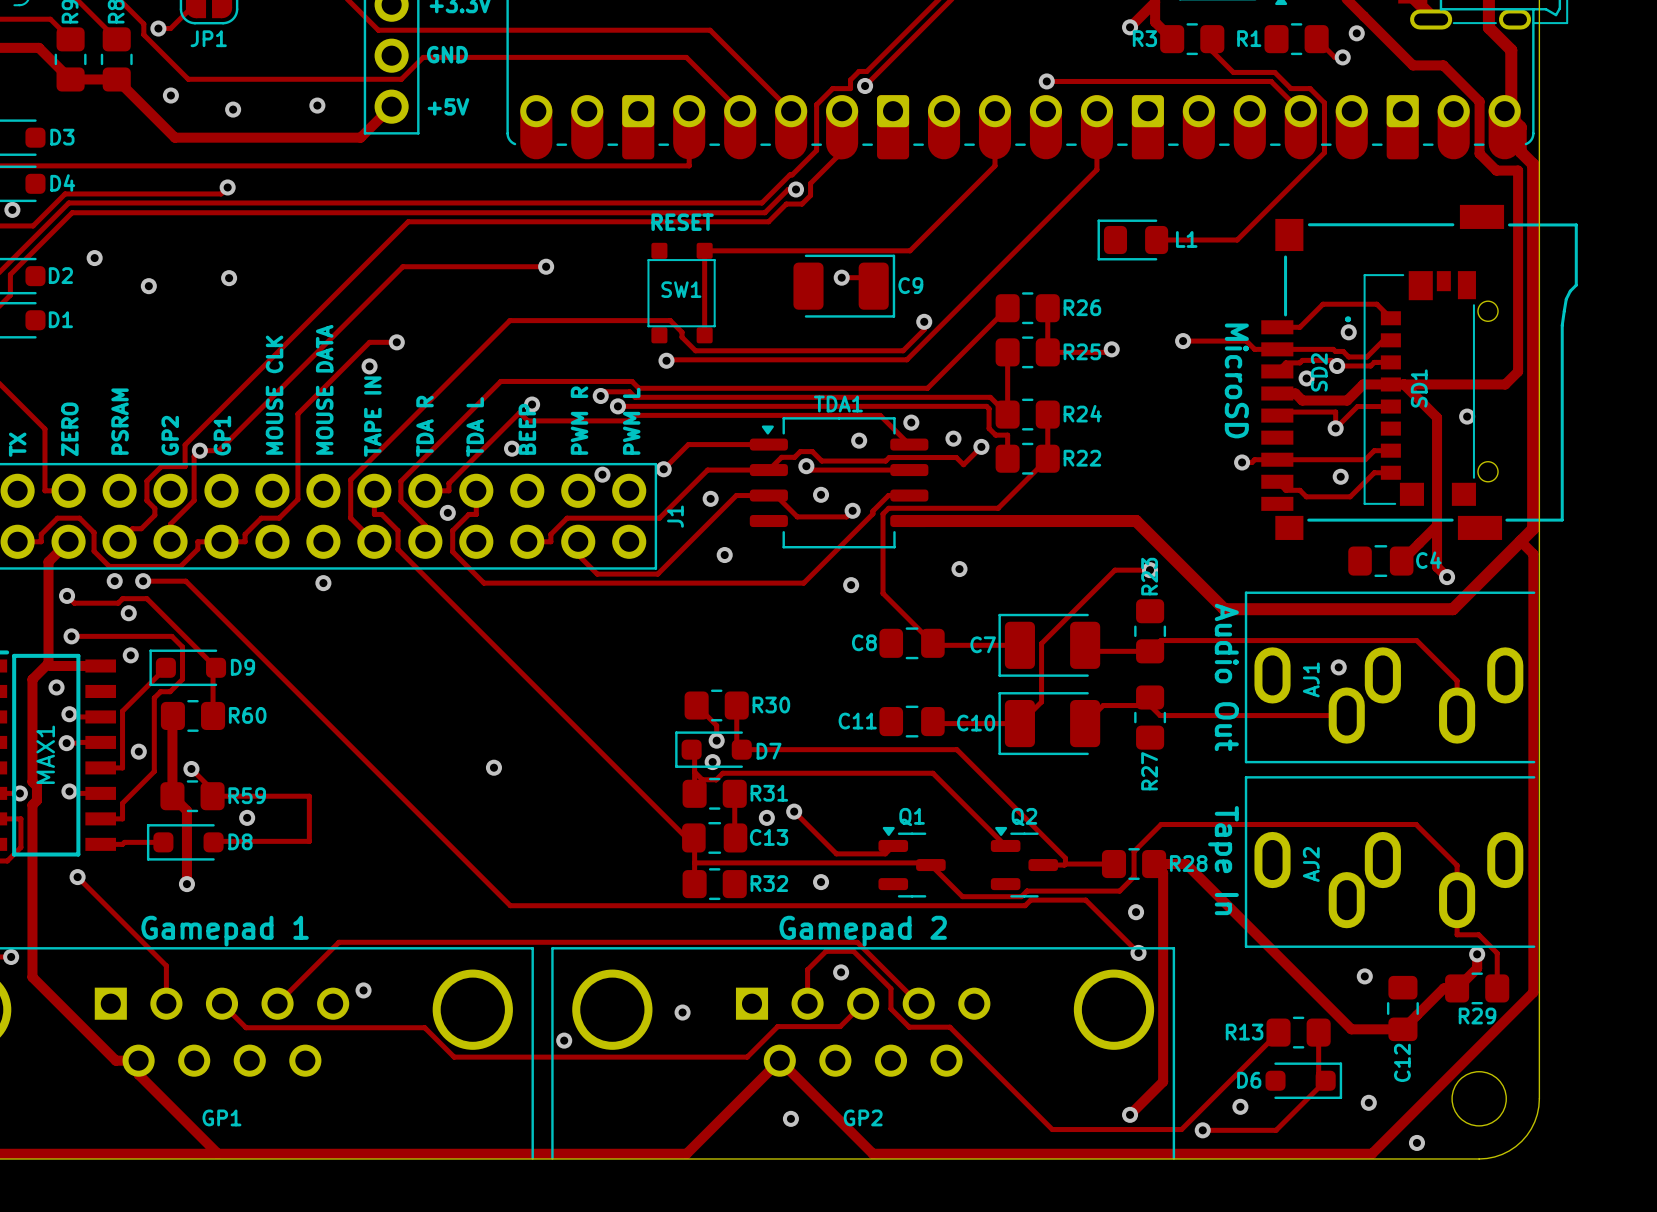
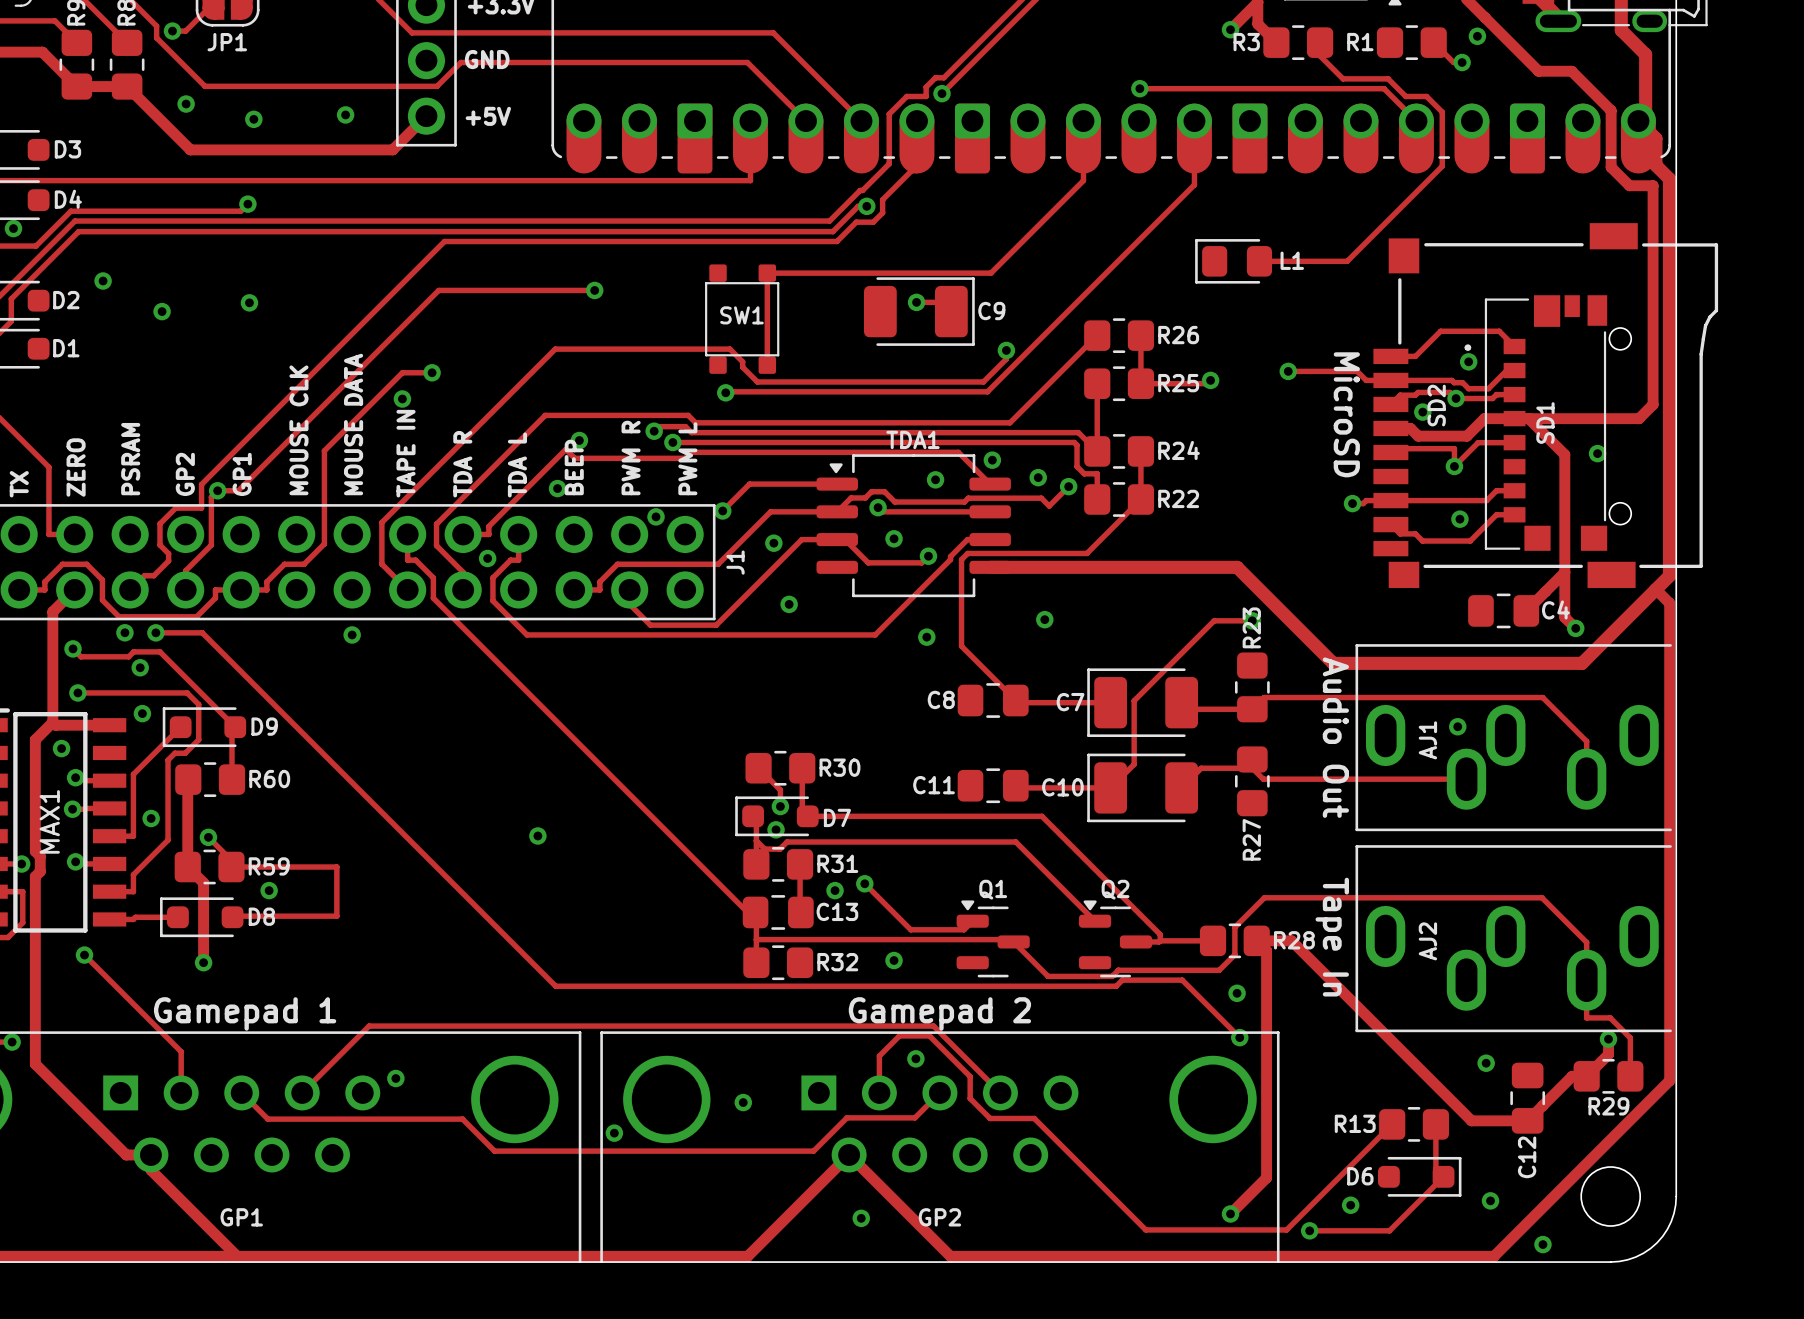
text: RESET (682, 222) -> none

